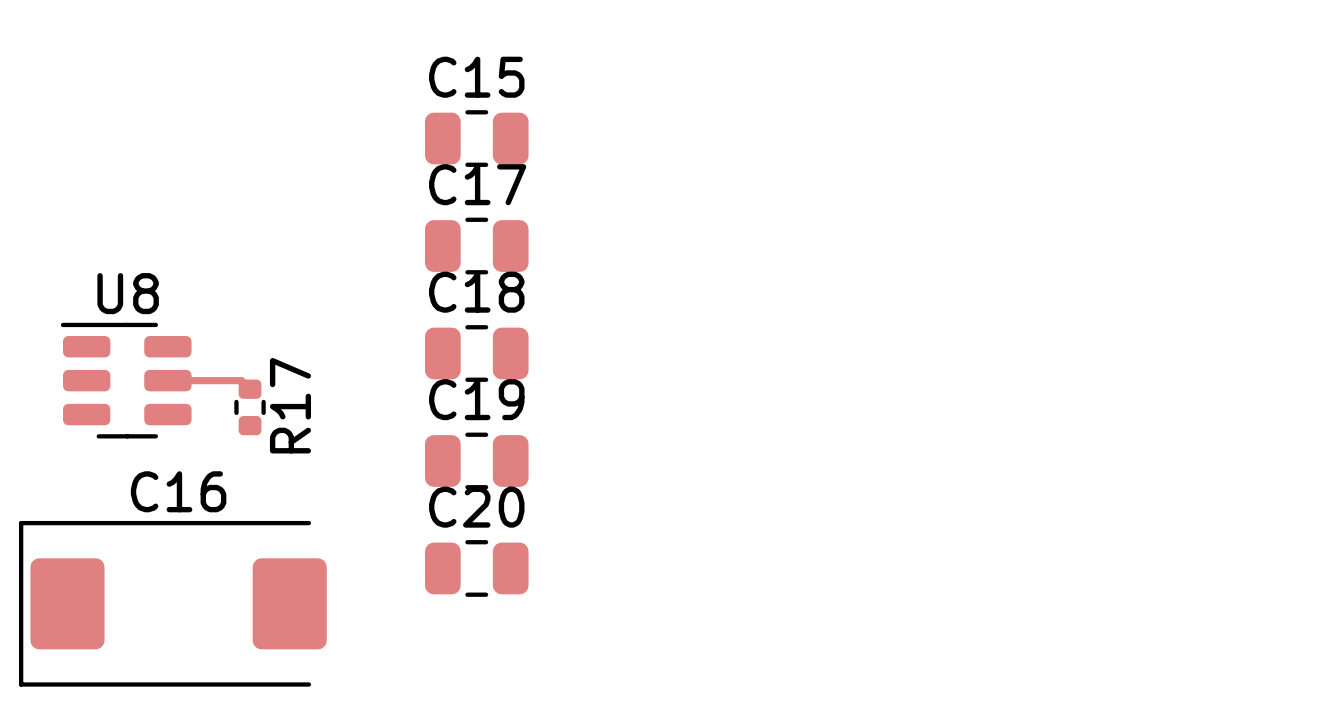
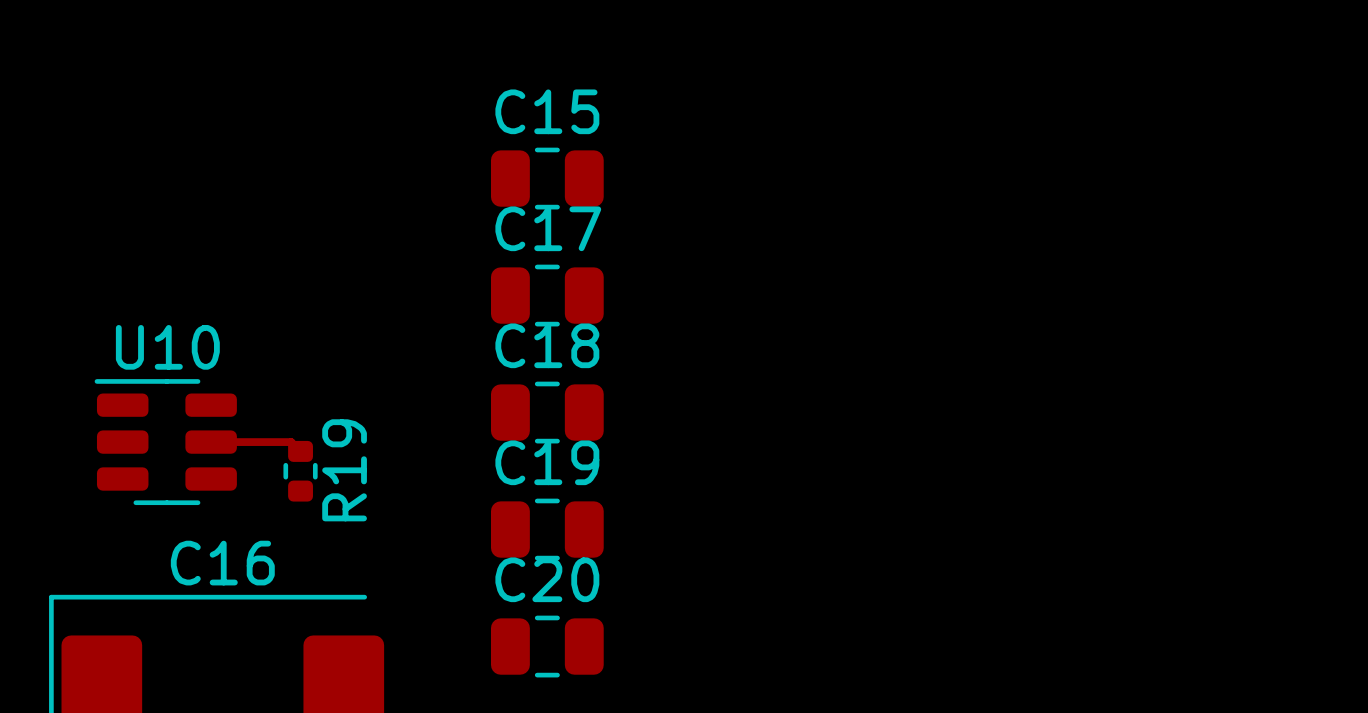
U8 name: U8 (128, 293) -> U10 (167, 347)
R17 name: R17 (290, 405) -> R19 (344, 470)

